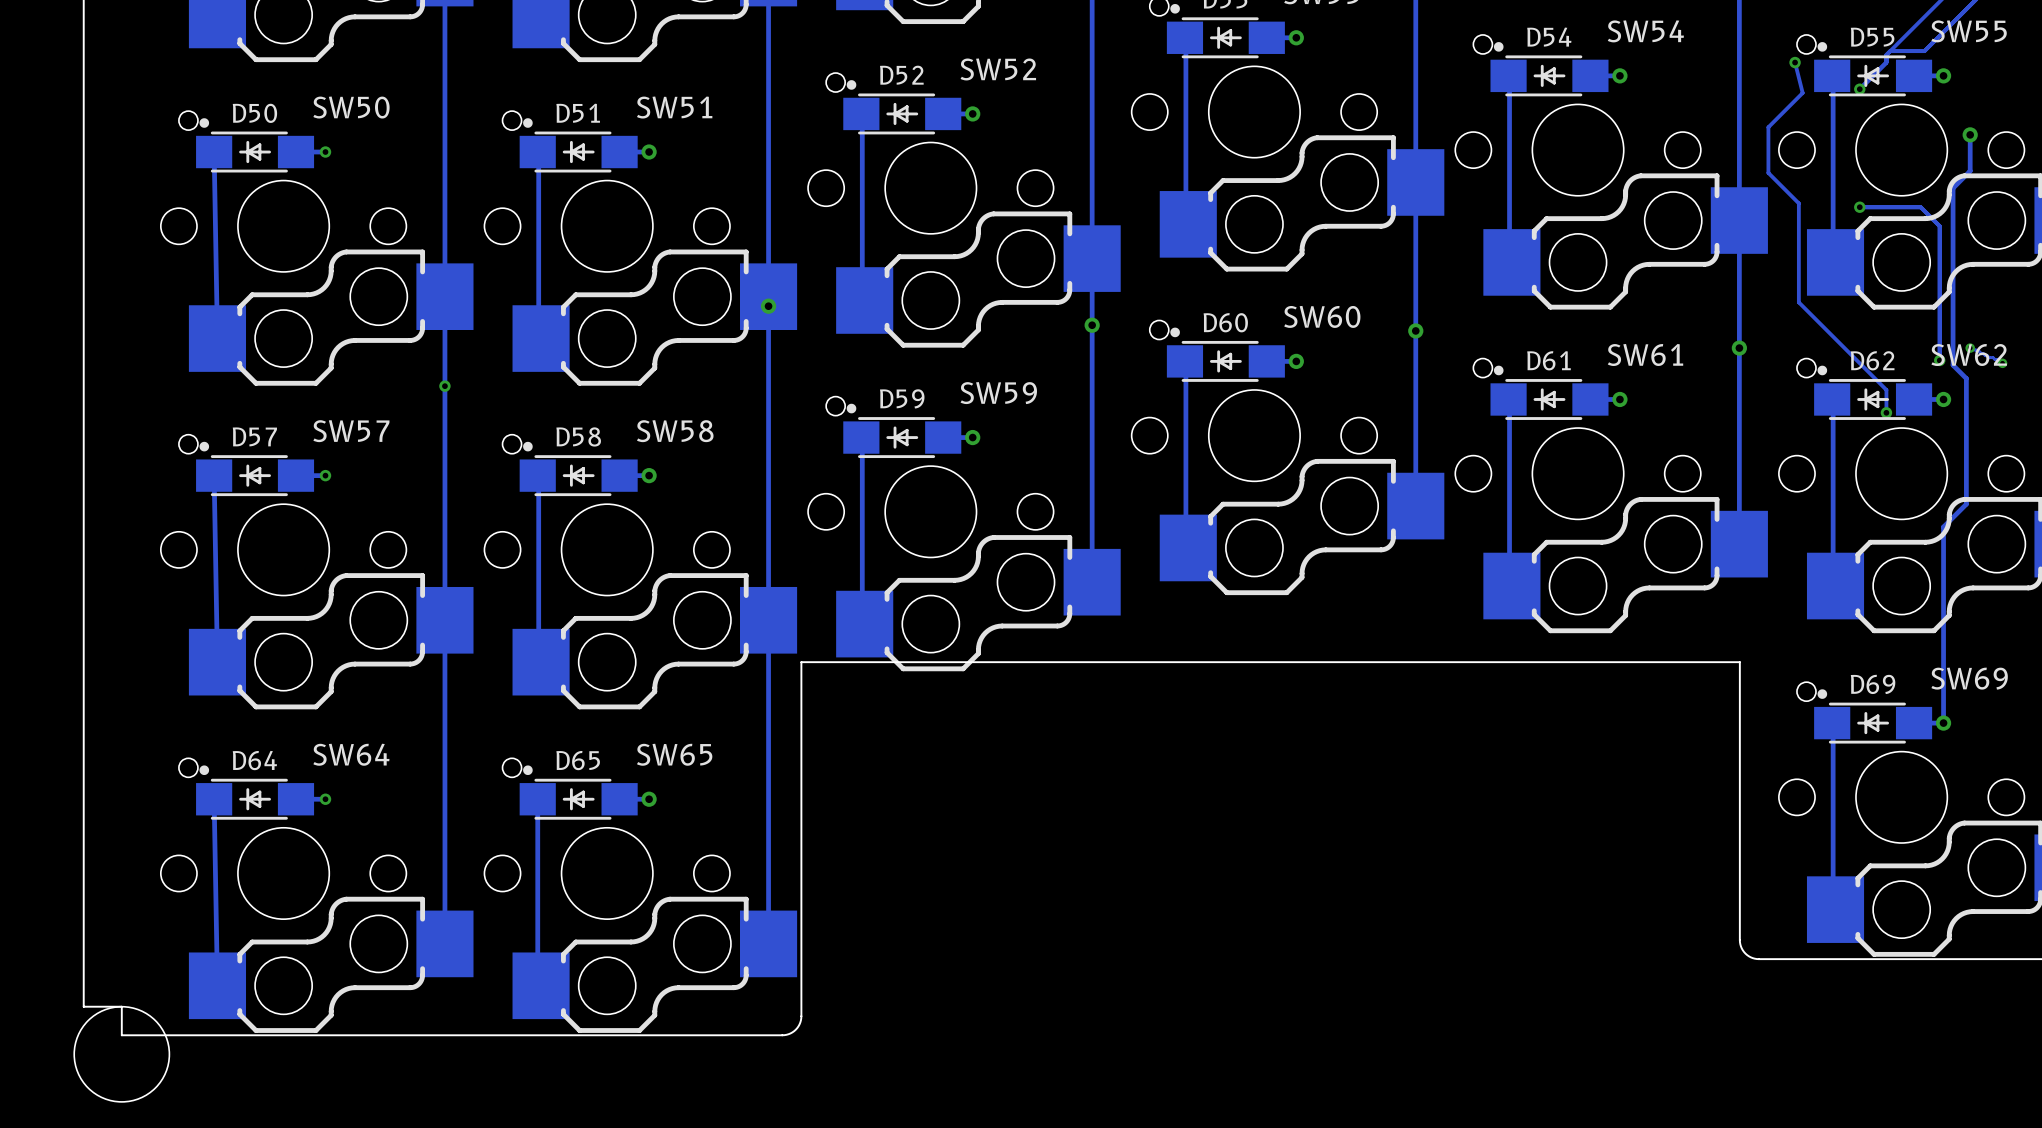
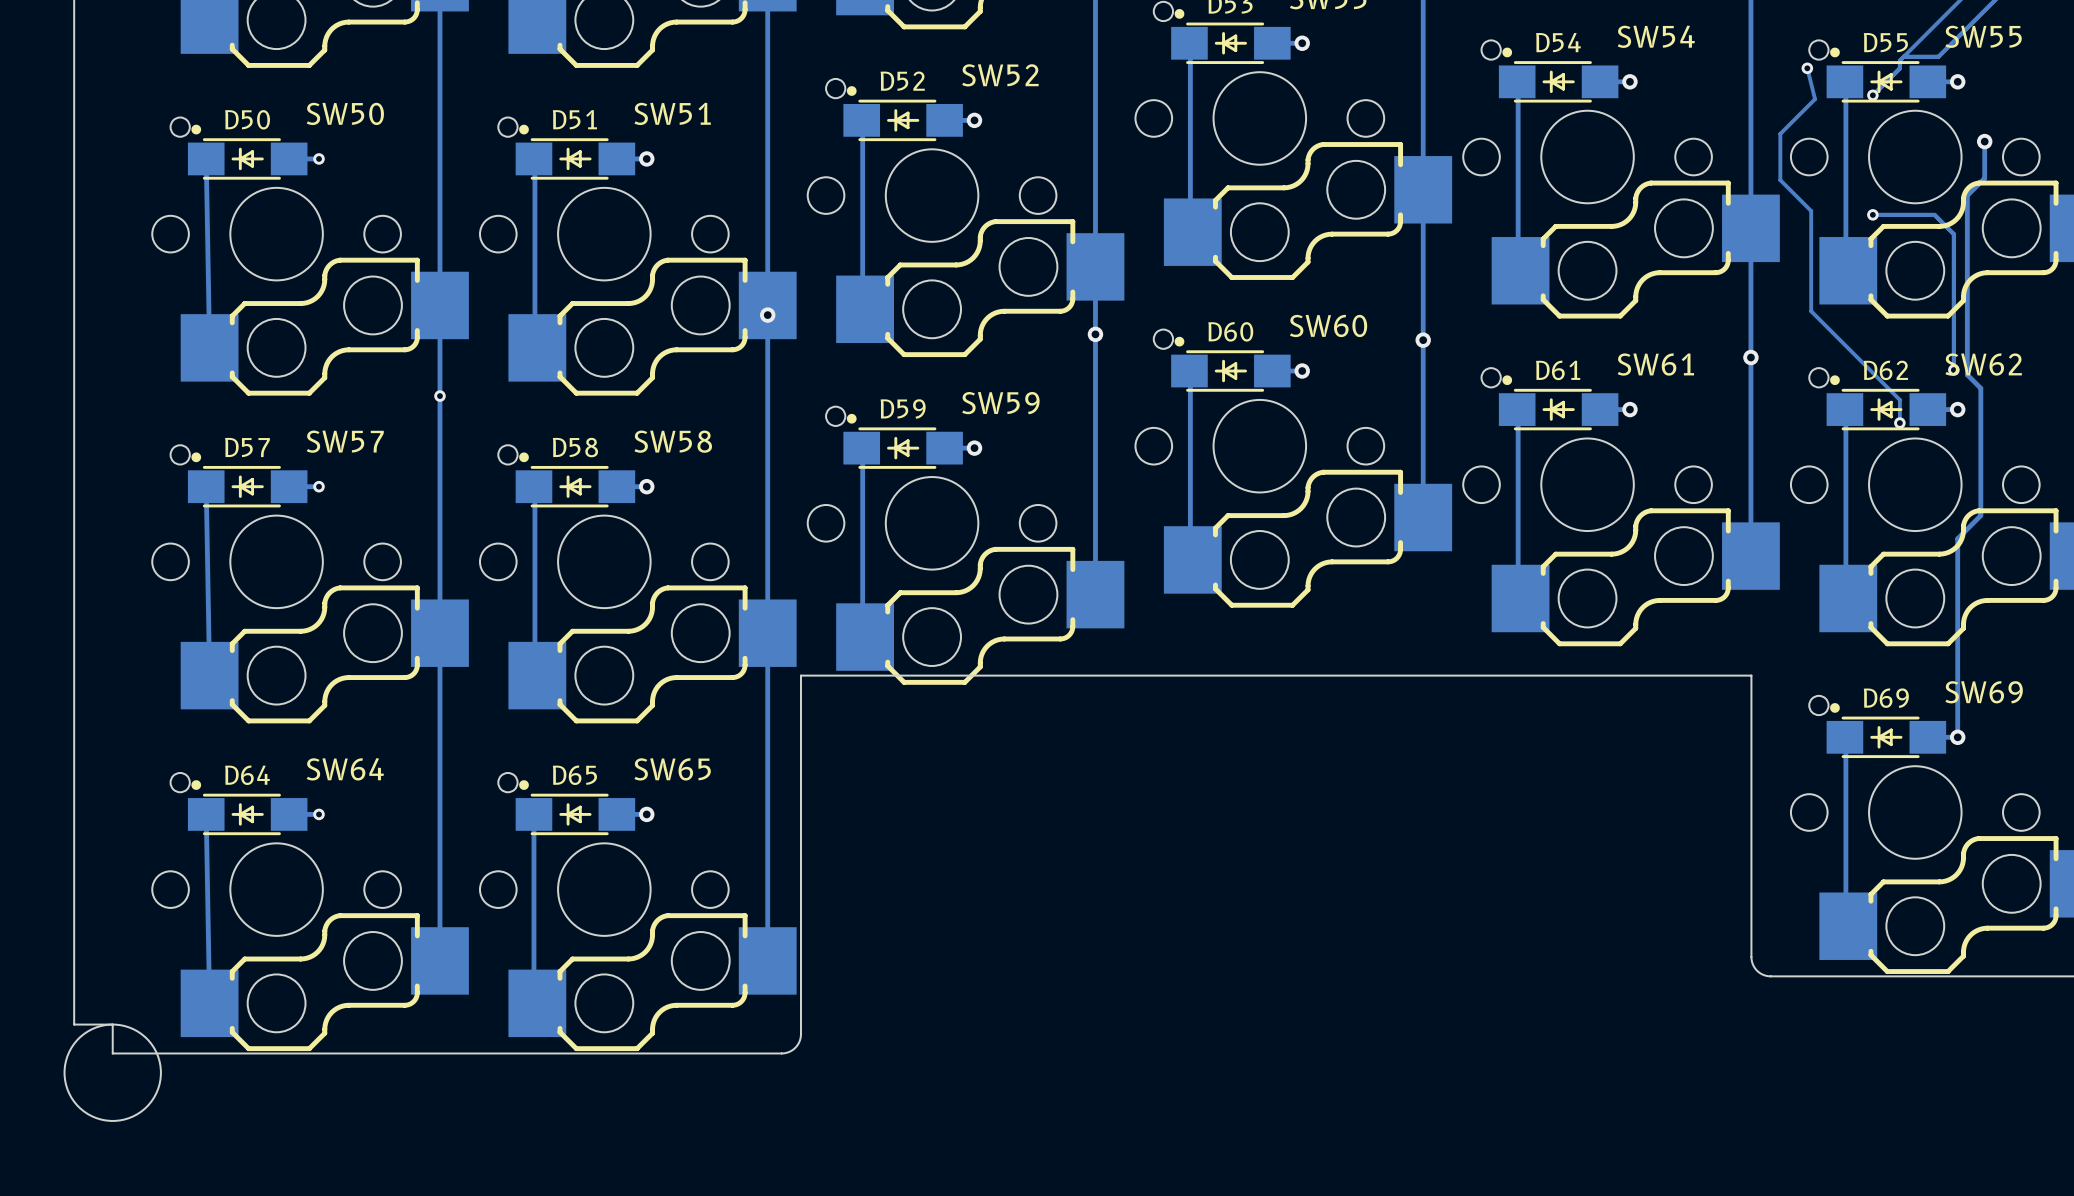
track: (1970, 348) (2002, 363) -> none
via: (1970, 348) -> none
via: (2002, 363) -> none

